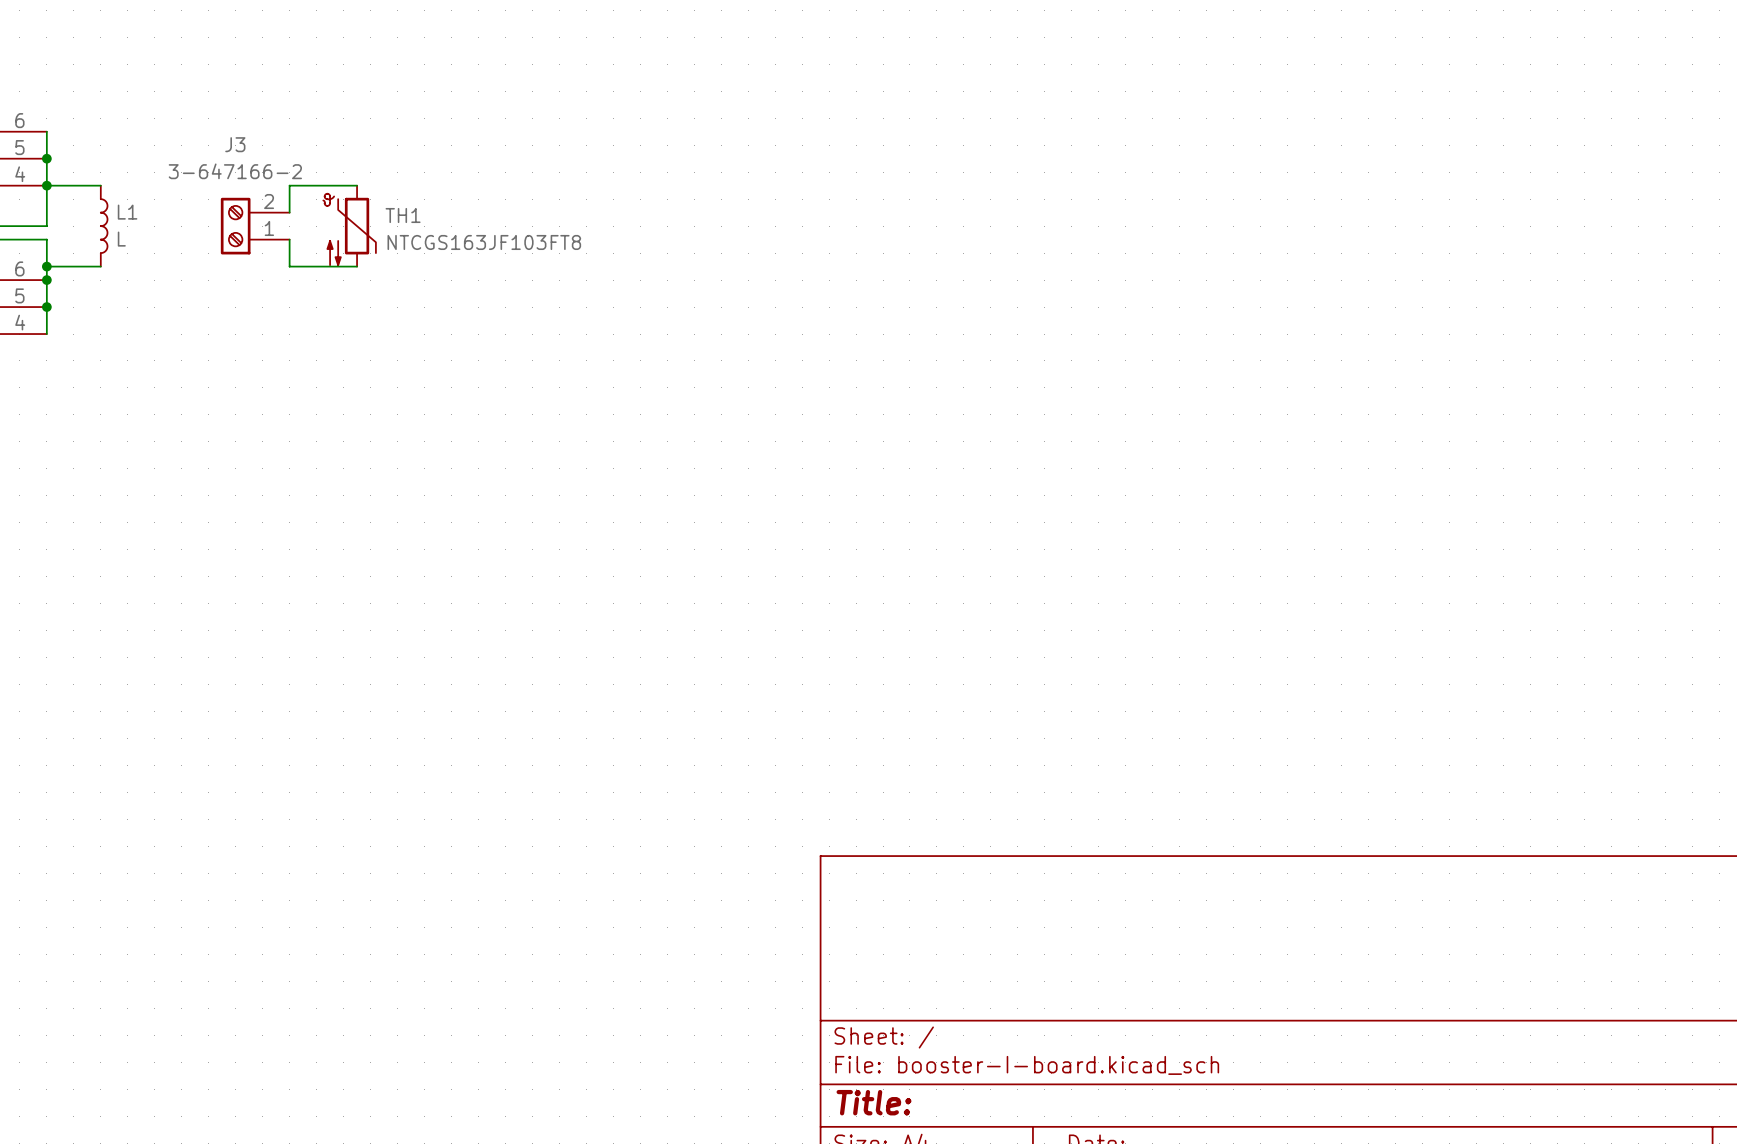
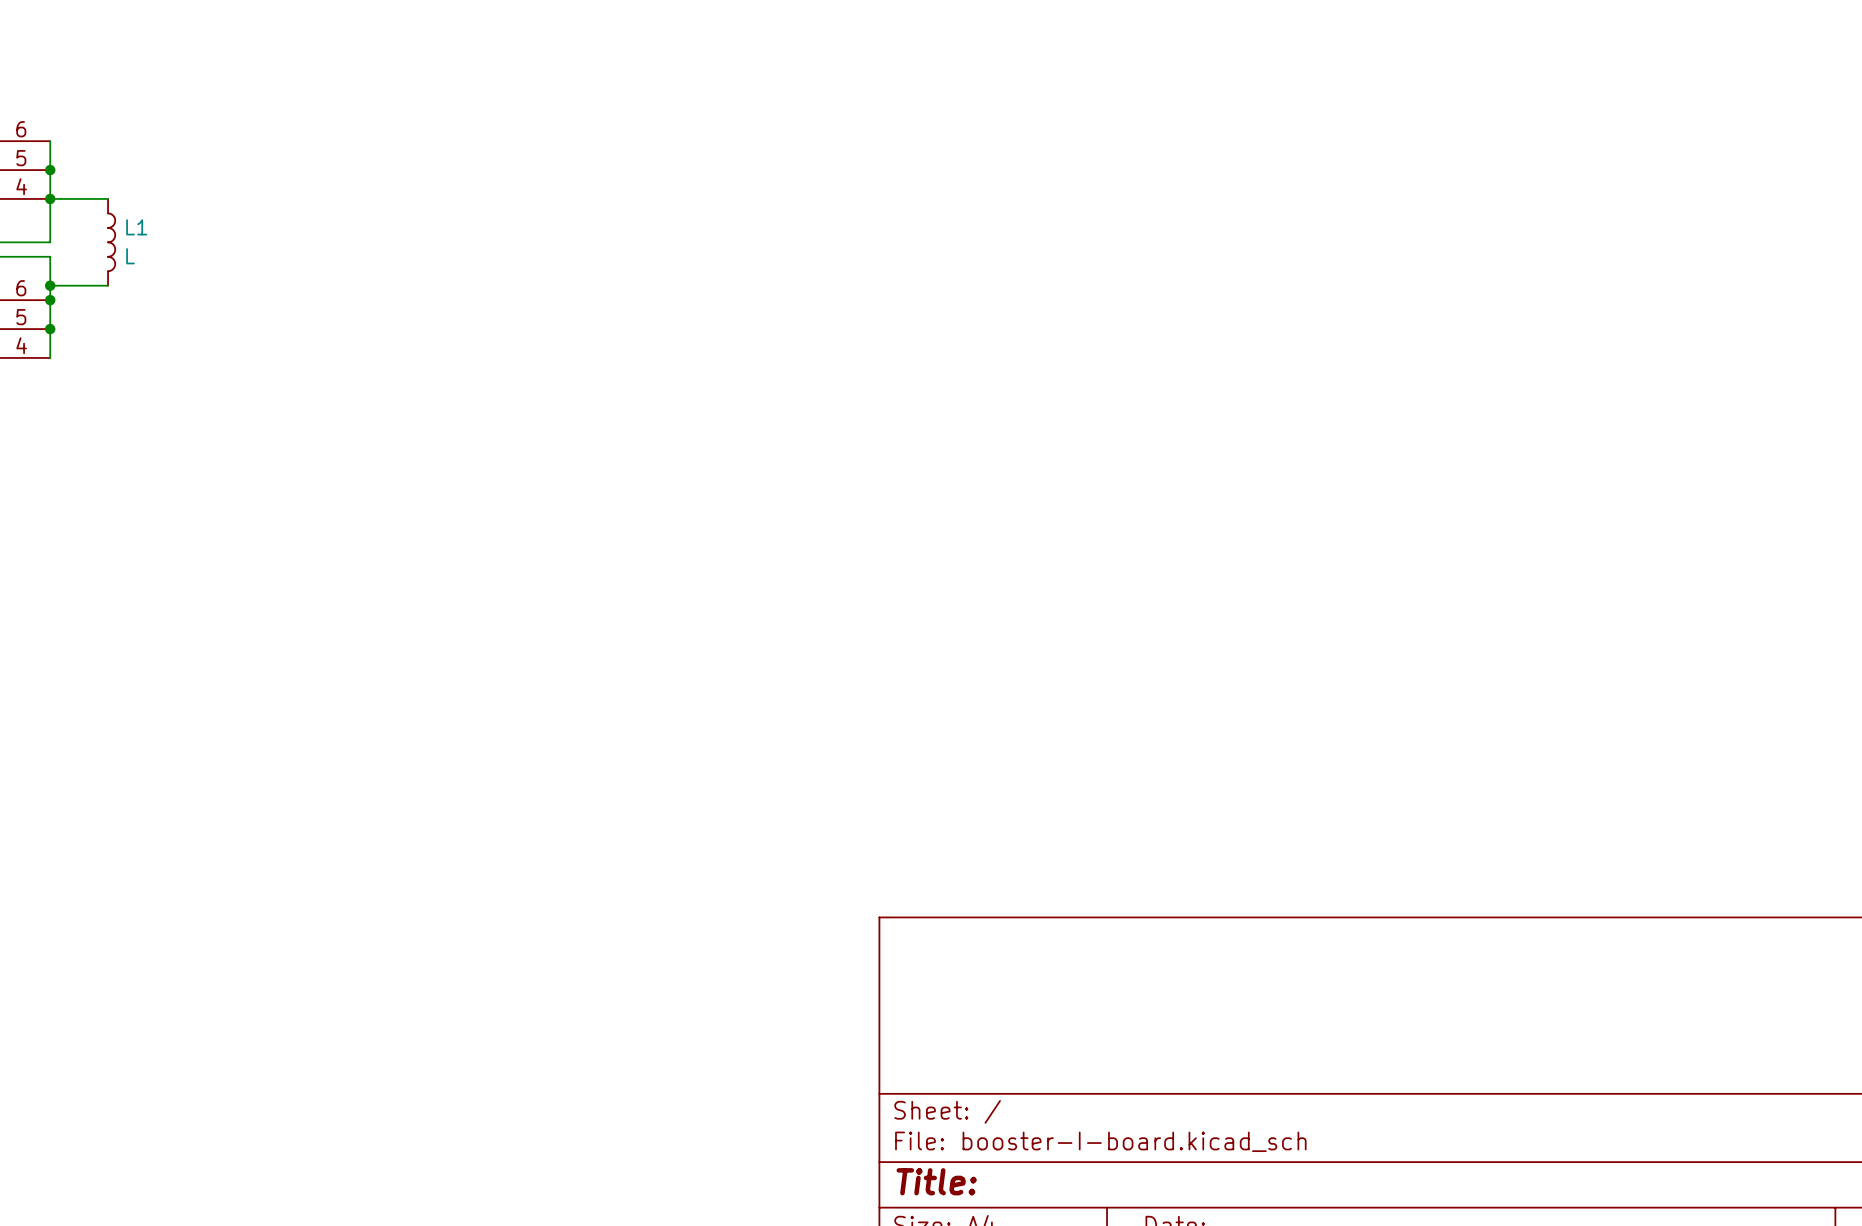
wire: (357, 185) (289, 185) (289, 212) -> none
J3: 3-647166-2 (255, 226) -> none
TH1: NTCGS163JF103FT8 (349, 226) -> none
wire: (289, 239) (289, 266) (357, 266) -> none

